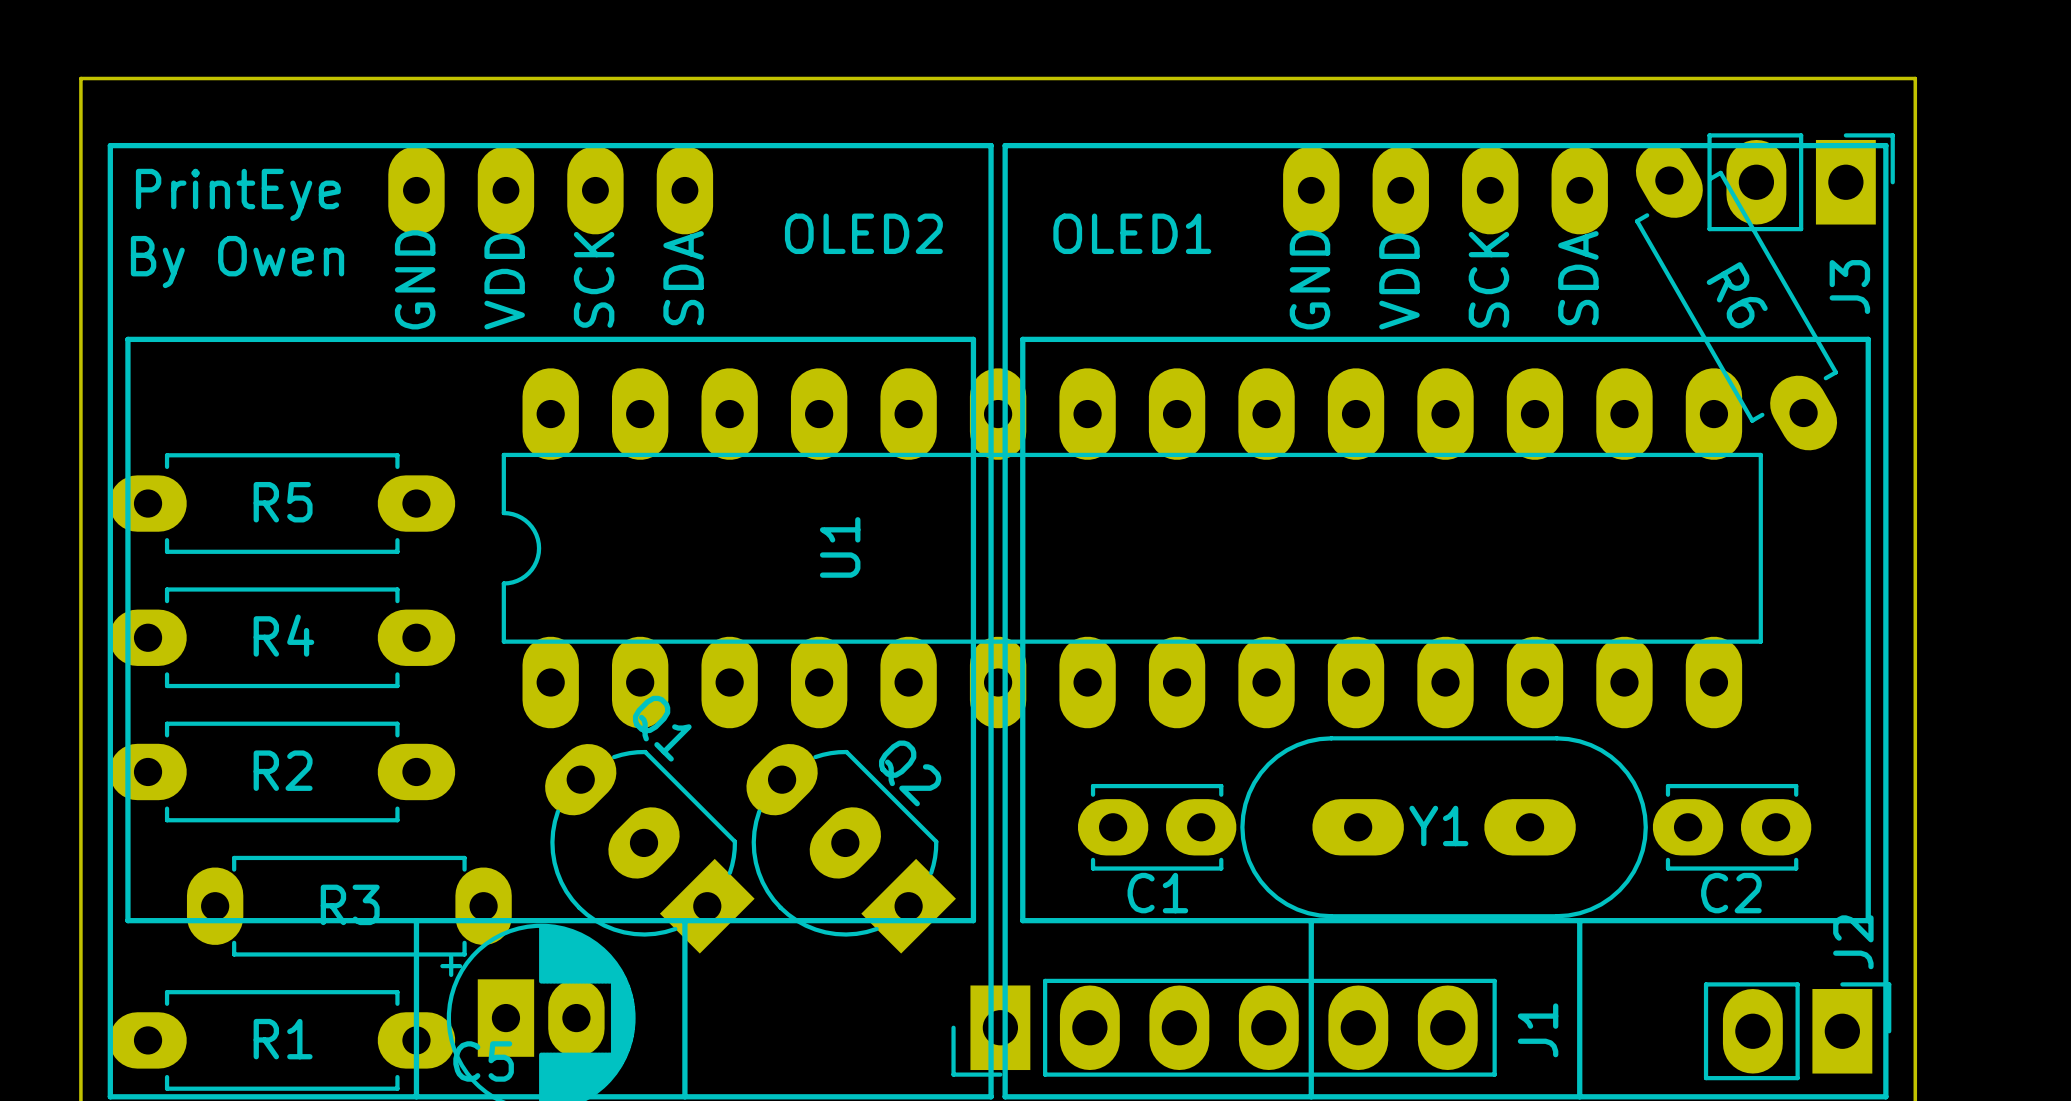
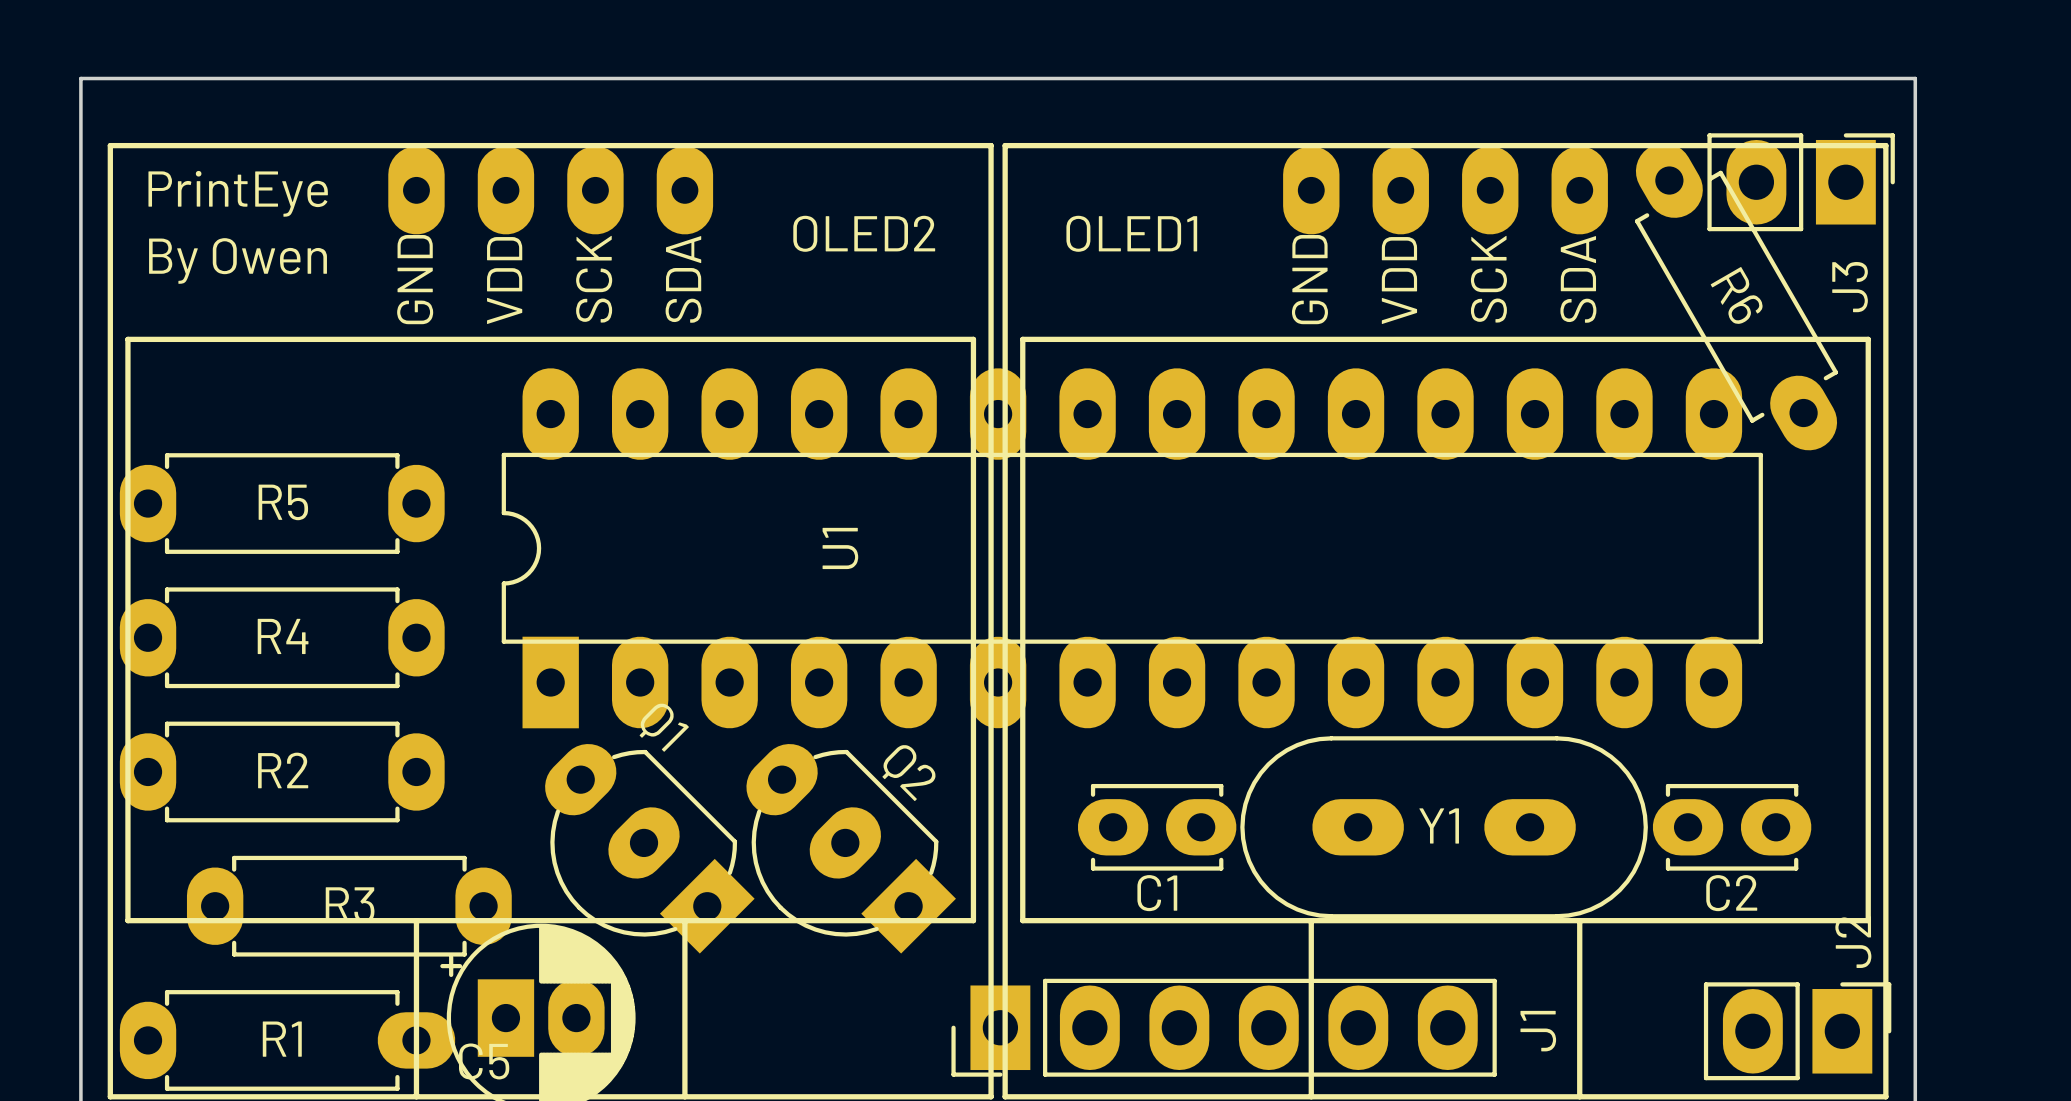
U1 footprint: [501, 368, 1763, 729] -> [501, 368, 1763, 729]
R5 footprint: [109, 453, 456, 554] -> [119, 453, 445, 554]
R4 footprint: [109, 587, 456, 689] -> [119, 587, 445, 689]
R2 footprint: [109, 721, 456, 823] -> [119, 721, 445, 823]
R1 footprint: [109, 990, 456, 1091] -> [119, 990, 456, 1091]

